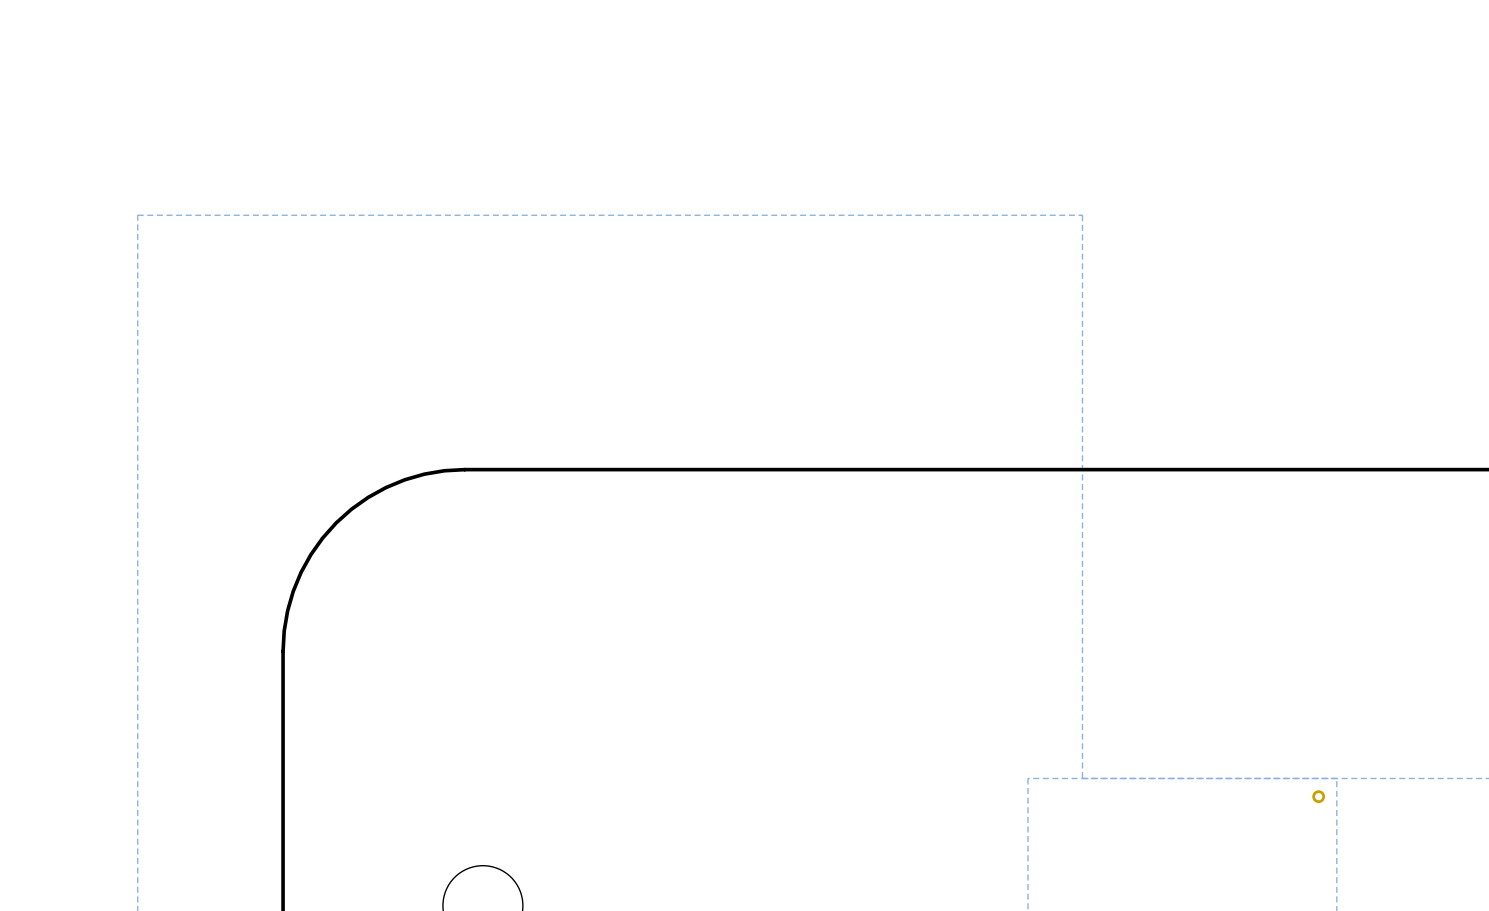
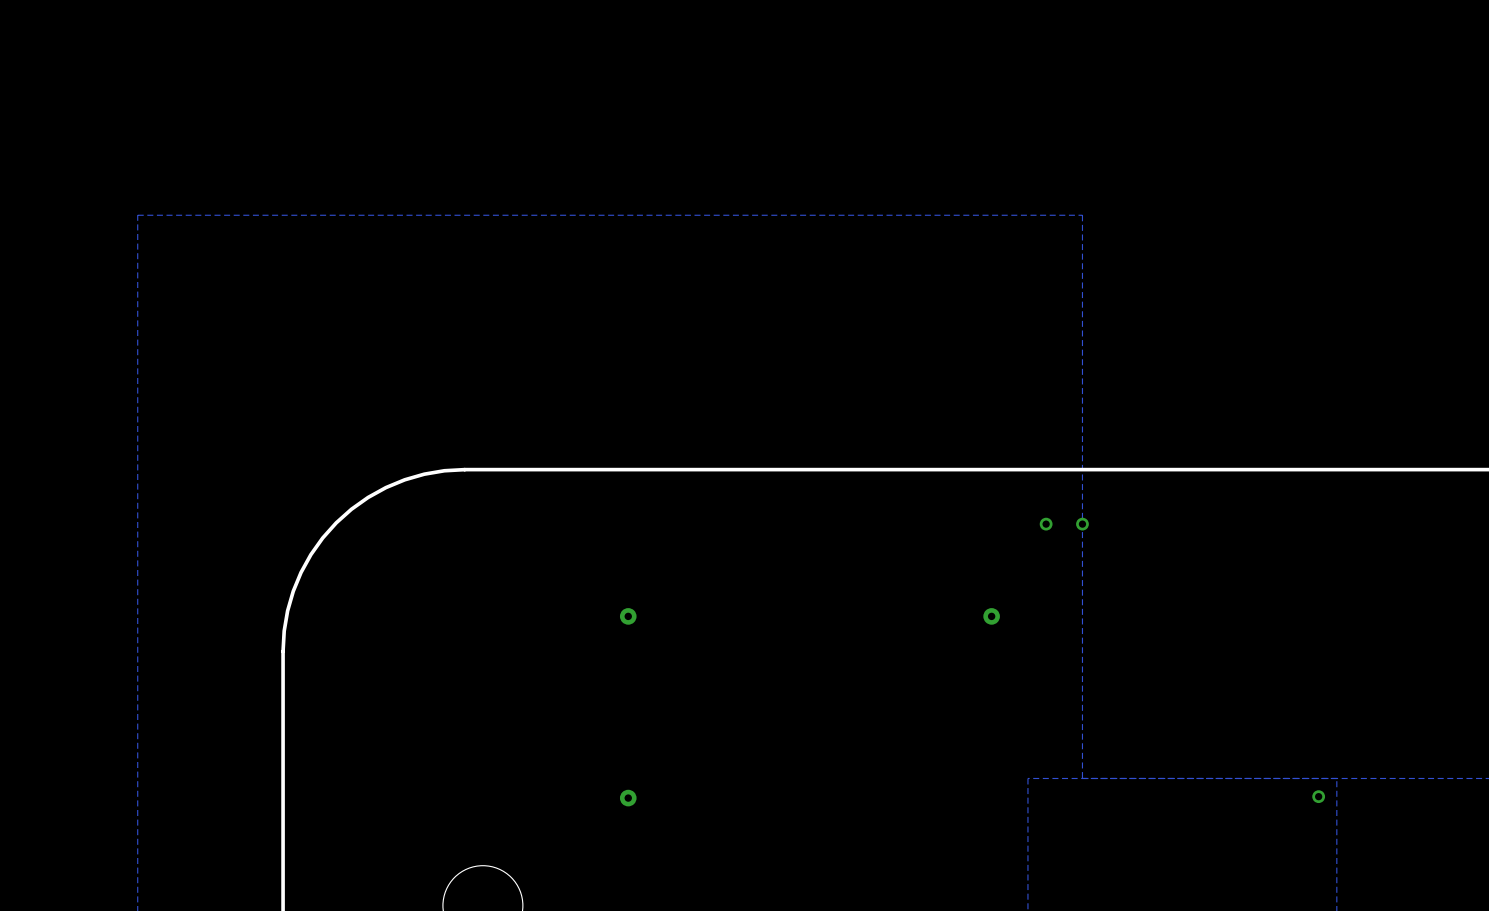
part: none -> (1064, 524)
via: none -> (628, 616)
via: none -> (991, 616)
via: none -> (628, 798)

